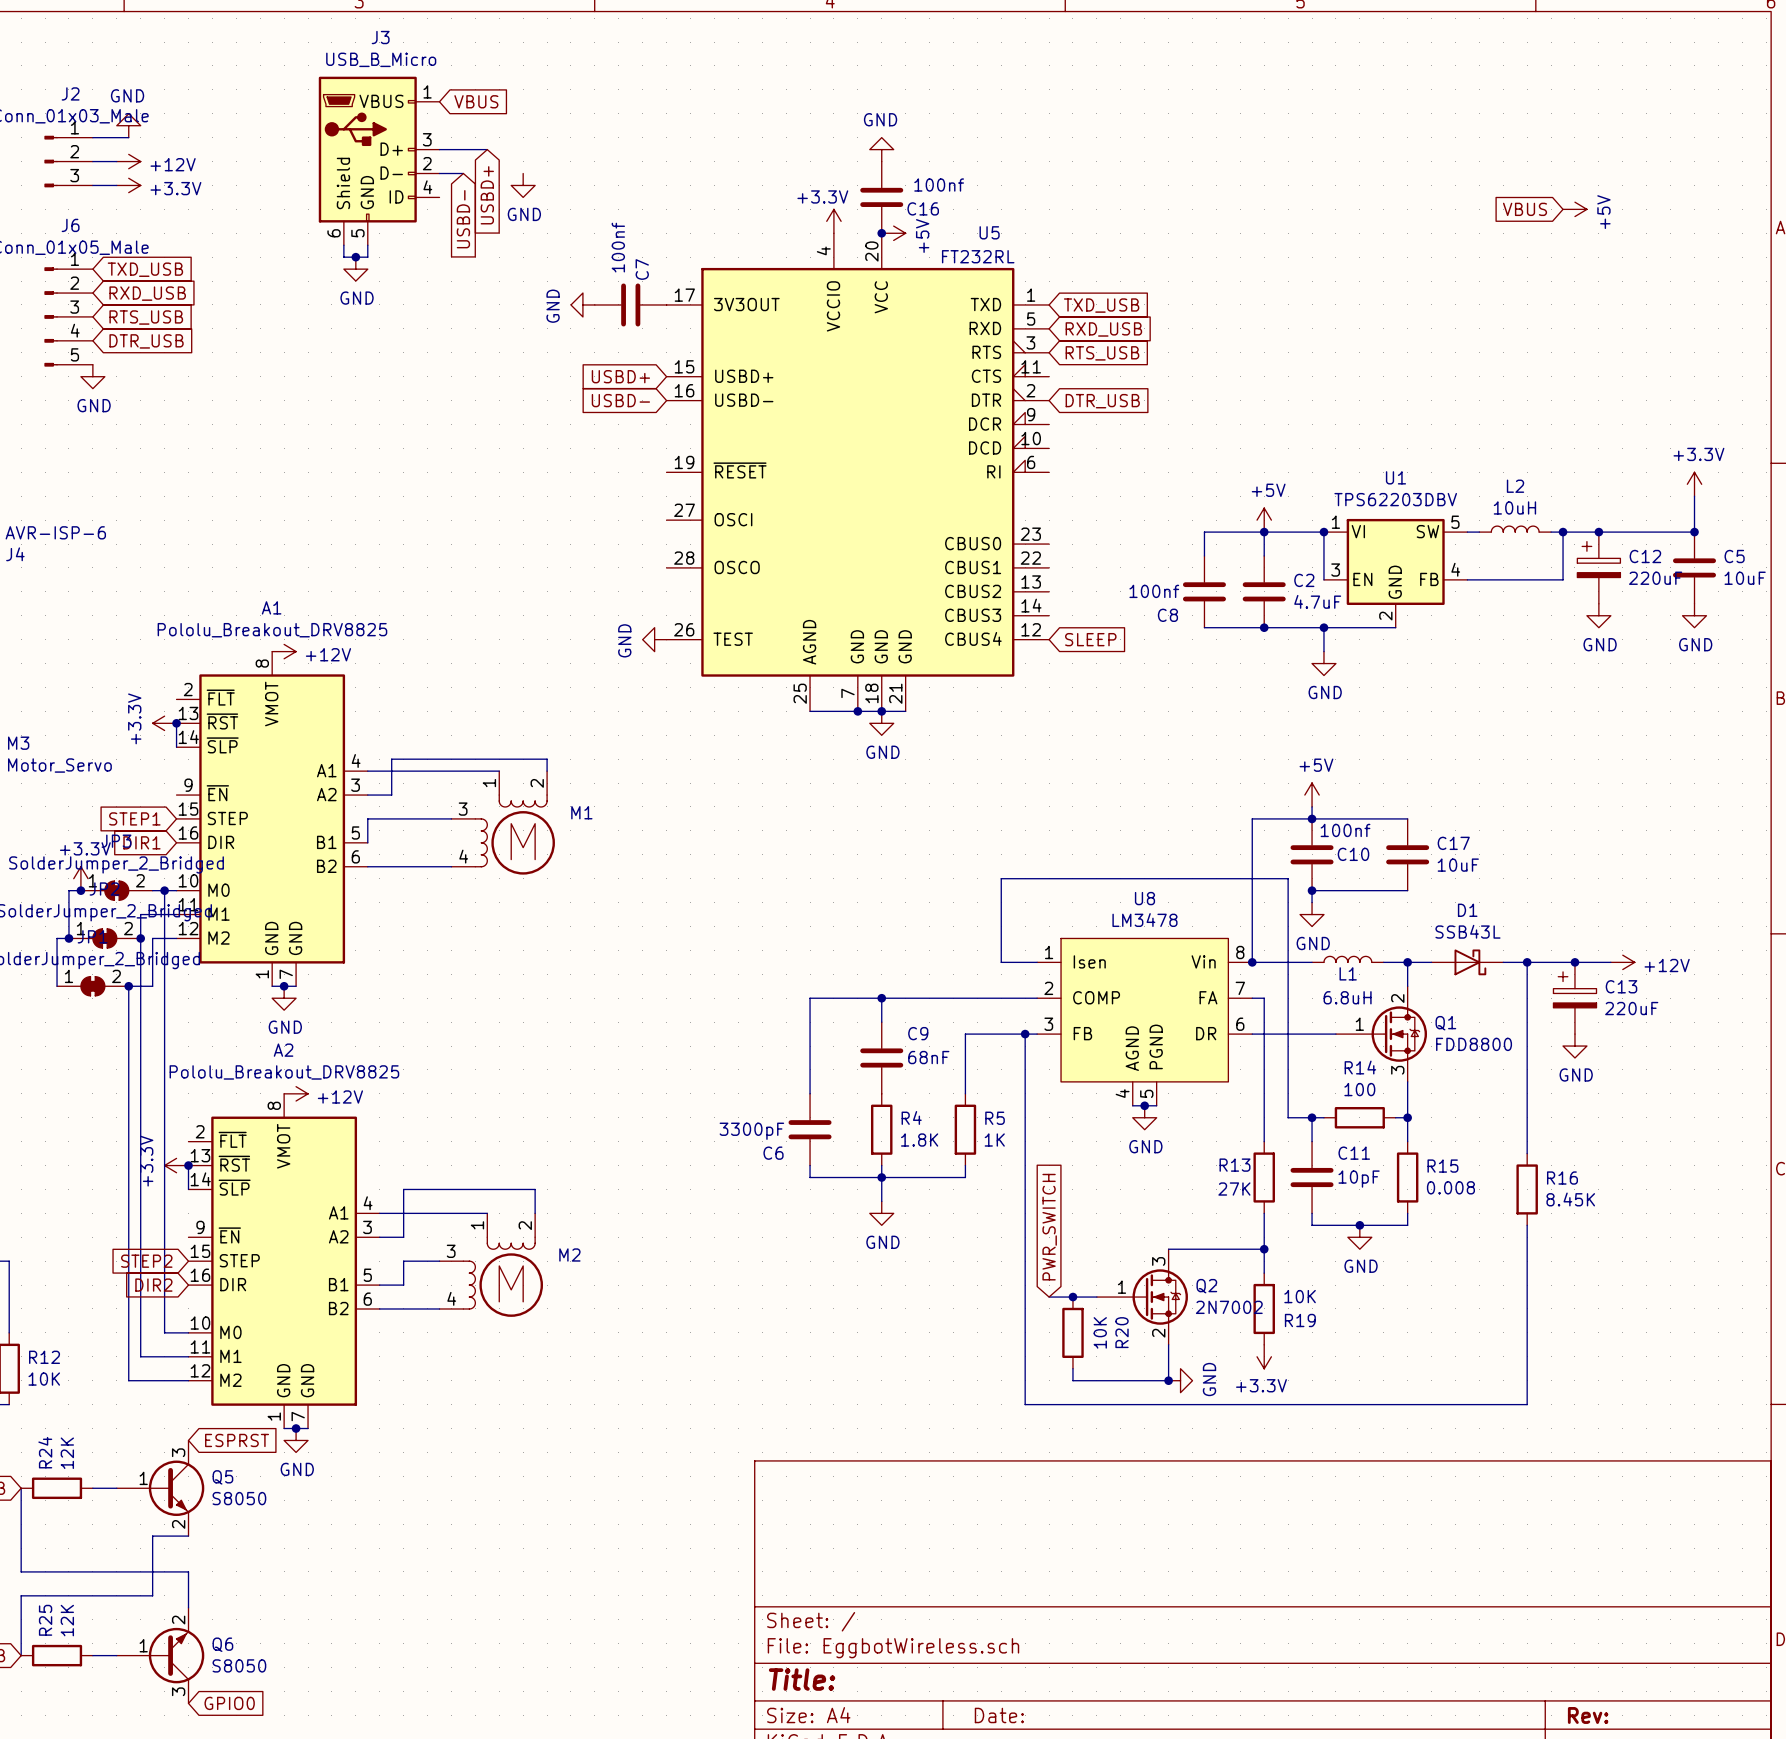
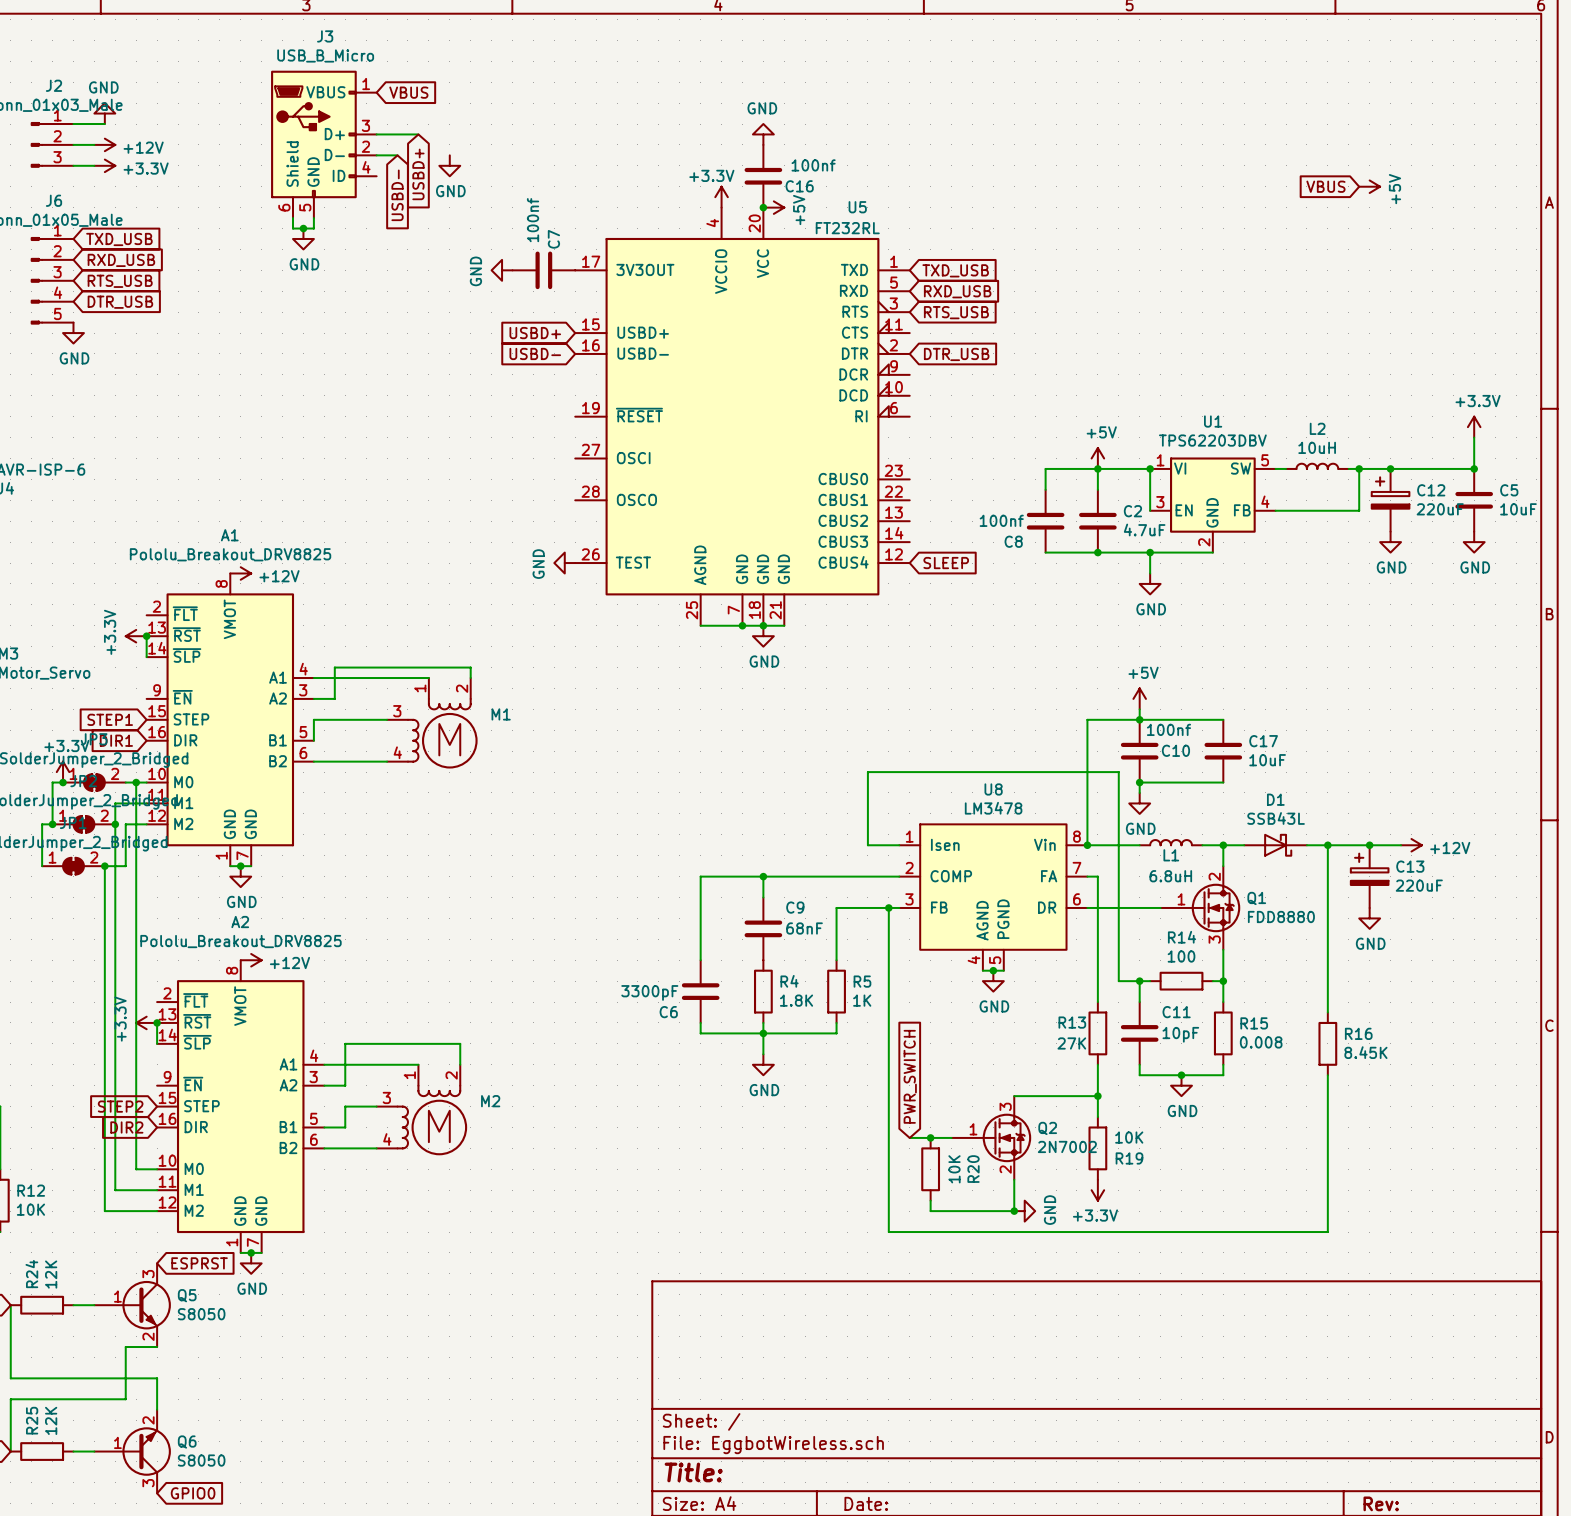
Q1 value: FDD8800 (1474, 1044) -> FDD8880 (1281, 916)

